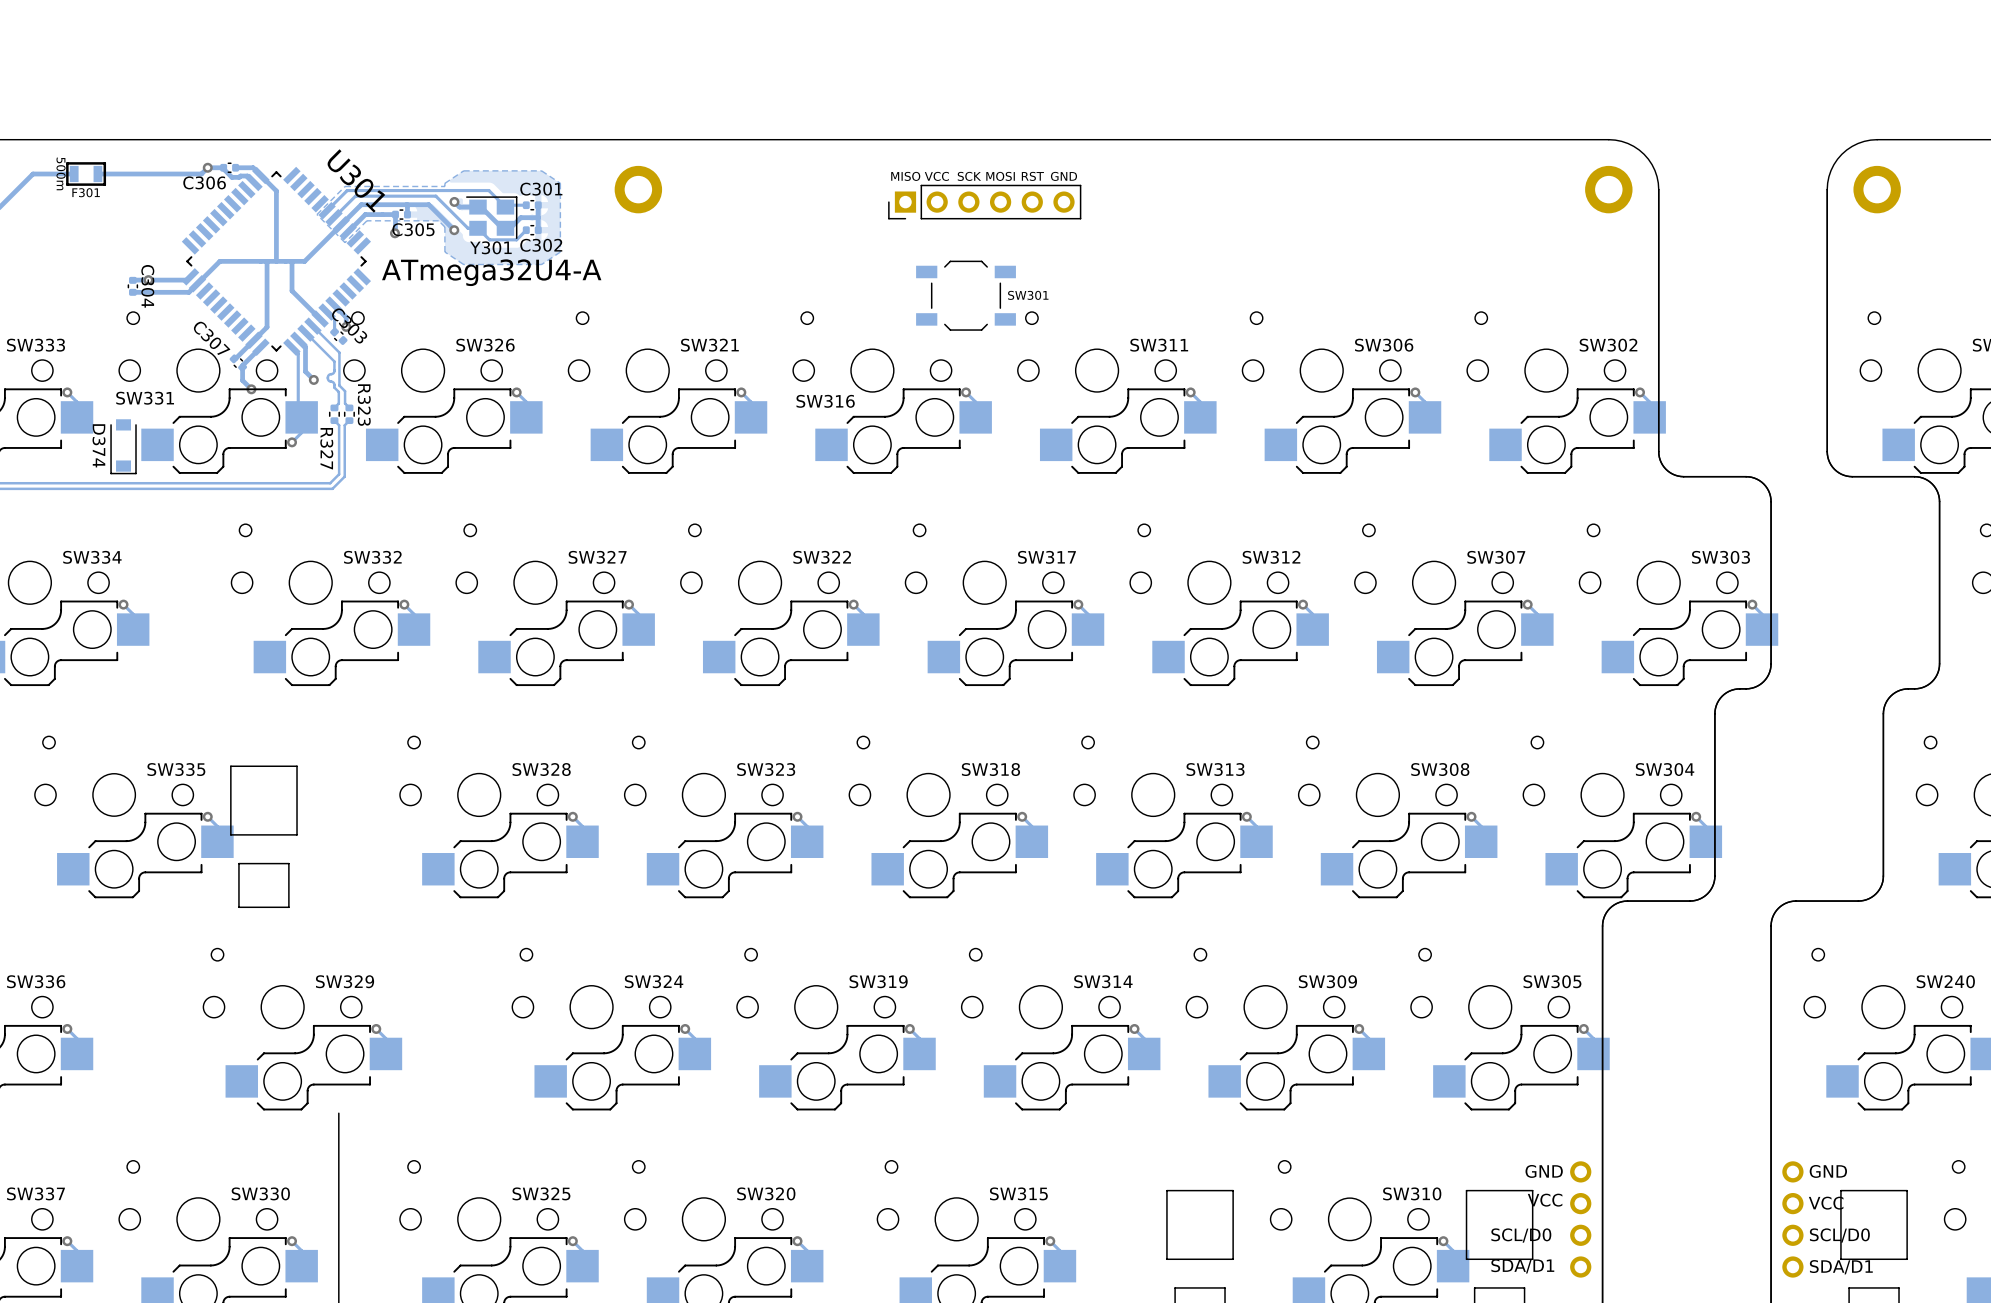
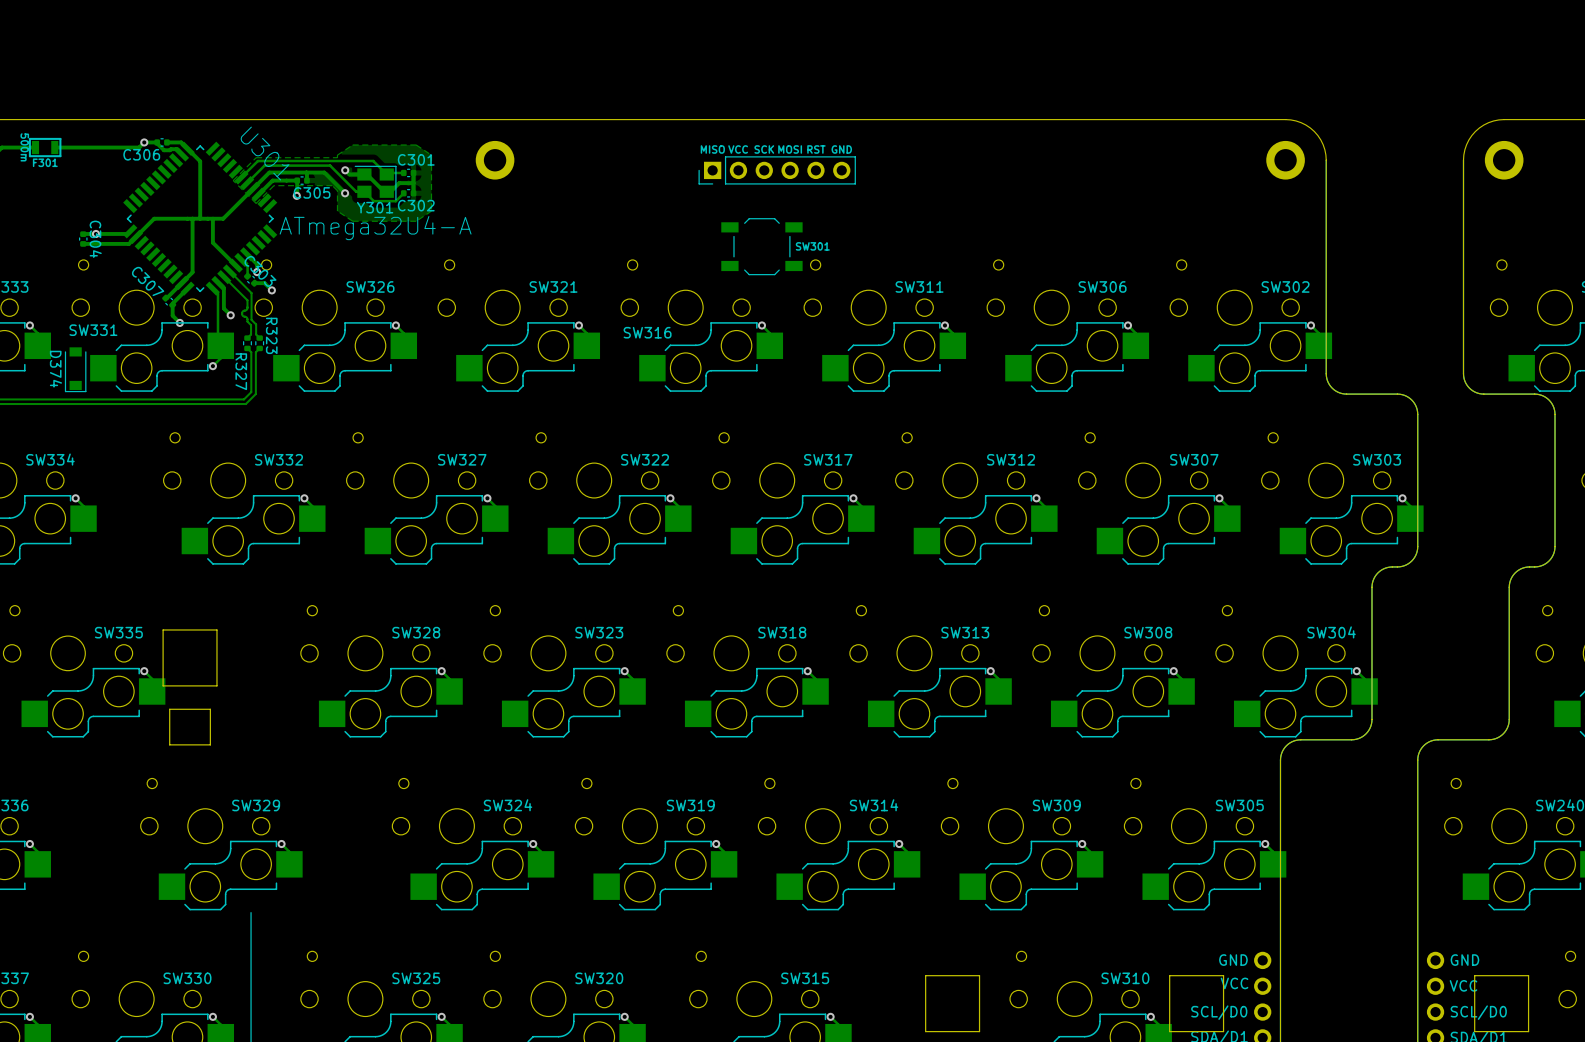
track: none -> (254, 283) (264, 283) (271, 290)
via: none -> (271, 290)

